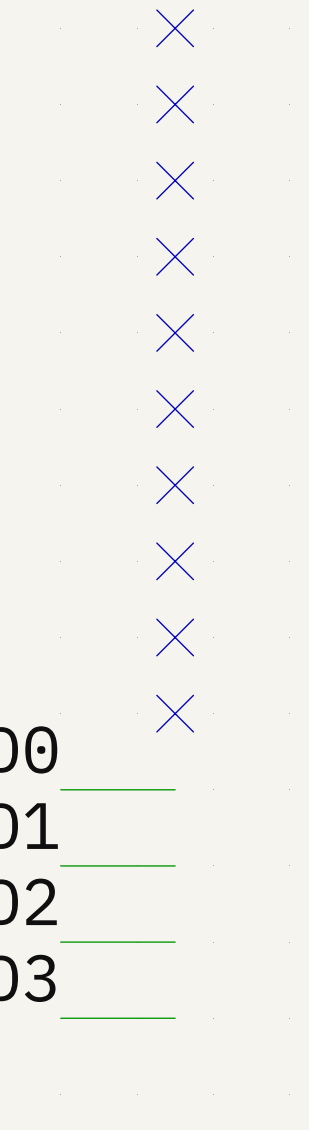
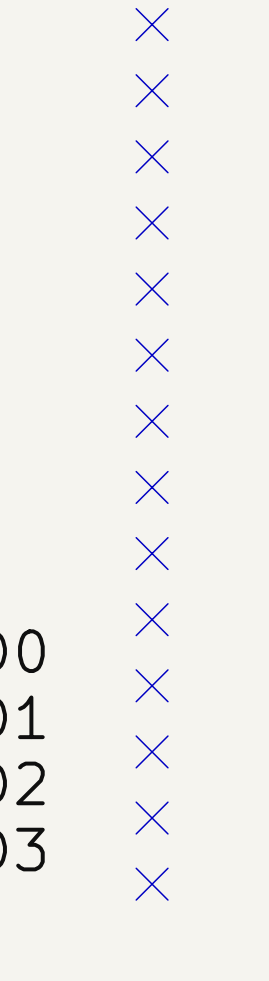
wire: (60, 789) (175, 789) -> none
no-connect mark: none -> (152, 685)
wire: (60, 865) (175, 865) -> none
no-connect mark: none -> (152, 751)
wire: (60, 942) (175, 942) -> none
no-connect mark: none -> (152, 818)
wire: (60, 1018) (175, 1018) -> none
no-connect mark: none -> (152, 884)

